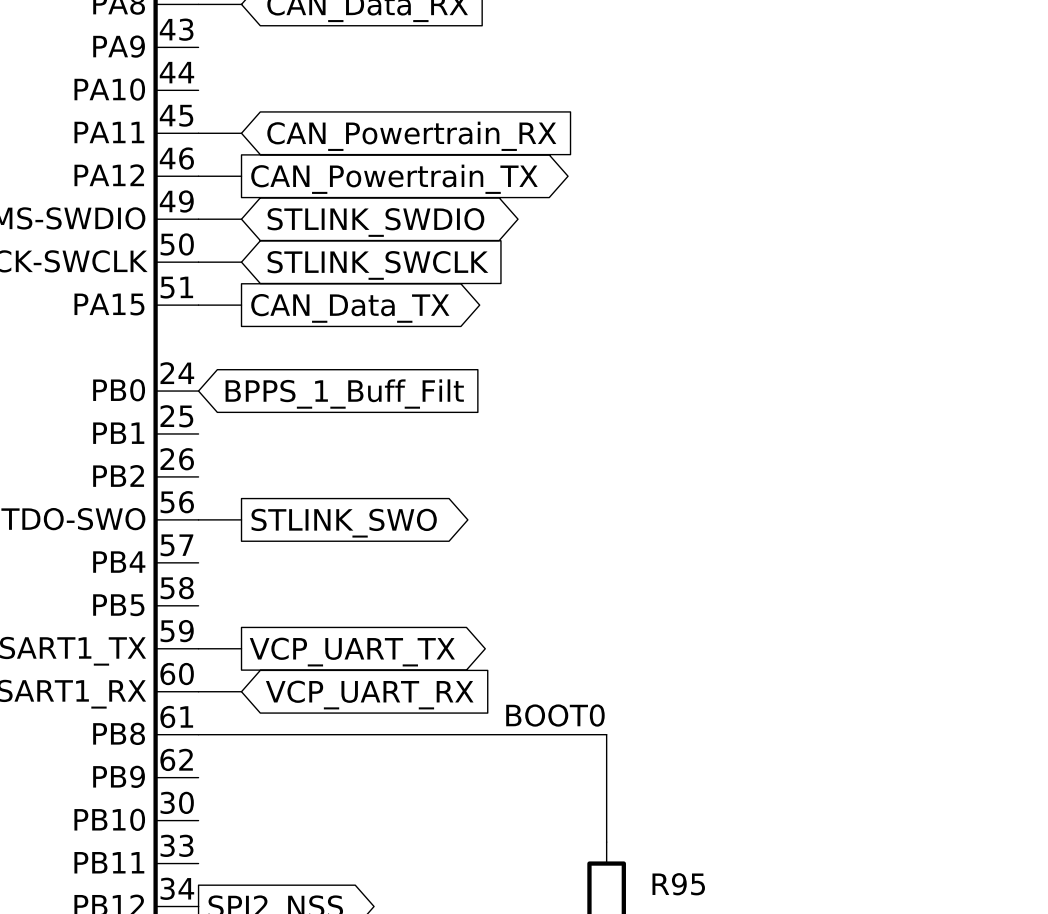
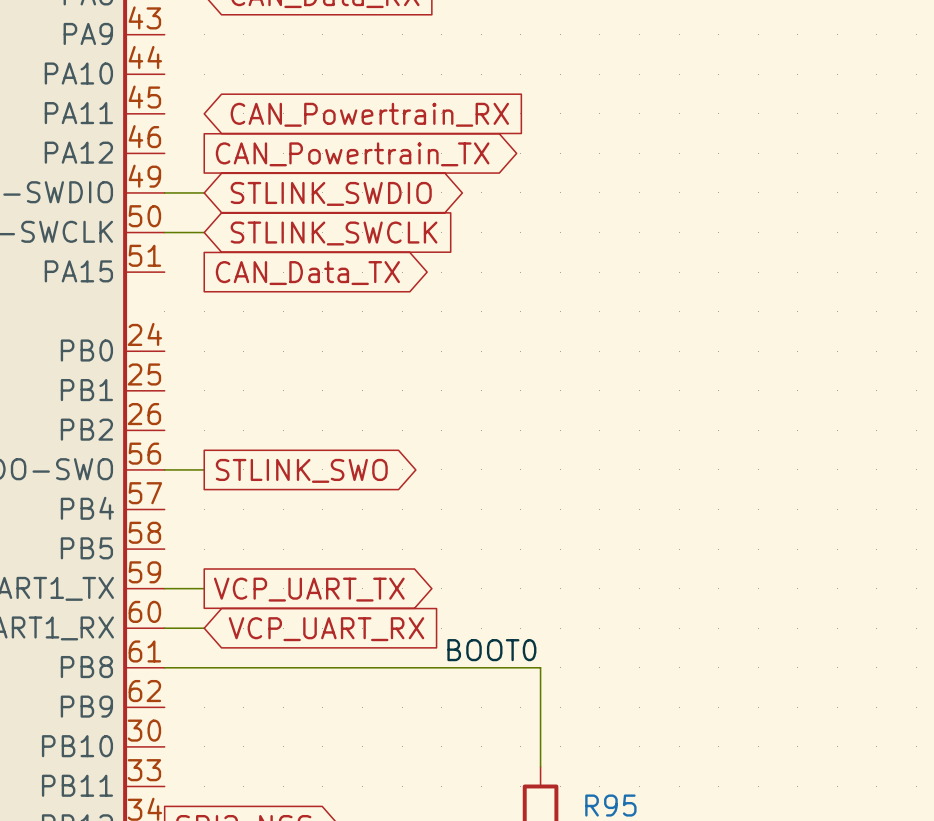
wire: (198, 133) (241, 133) -> none
wire: (198, 176) (241, 176) -> none
wire: (198, 305) (241, 305) -> none
global label: BPPS_1_Buff_Filt (344, 394) -> none

